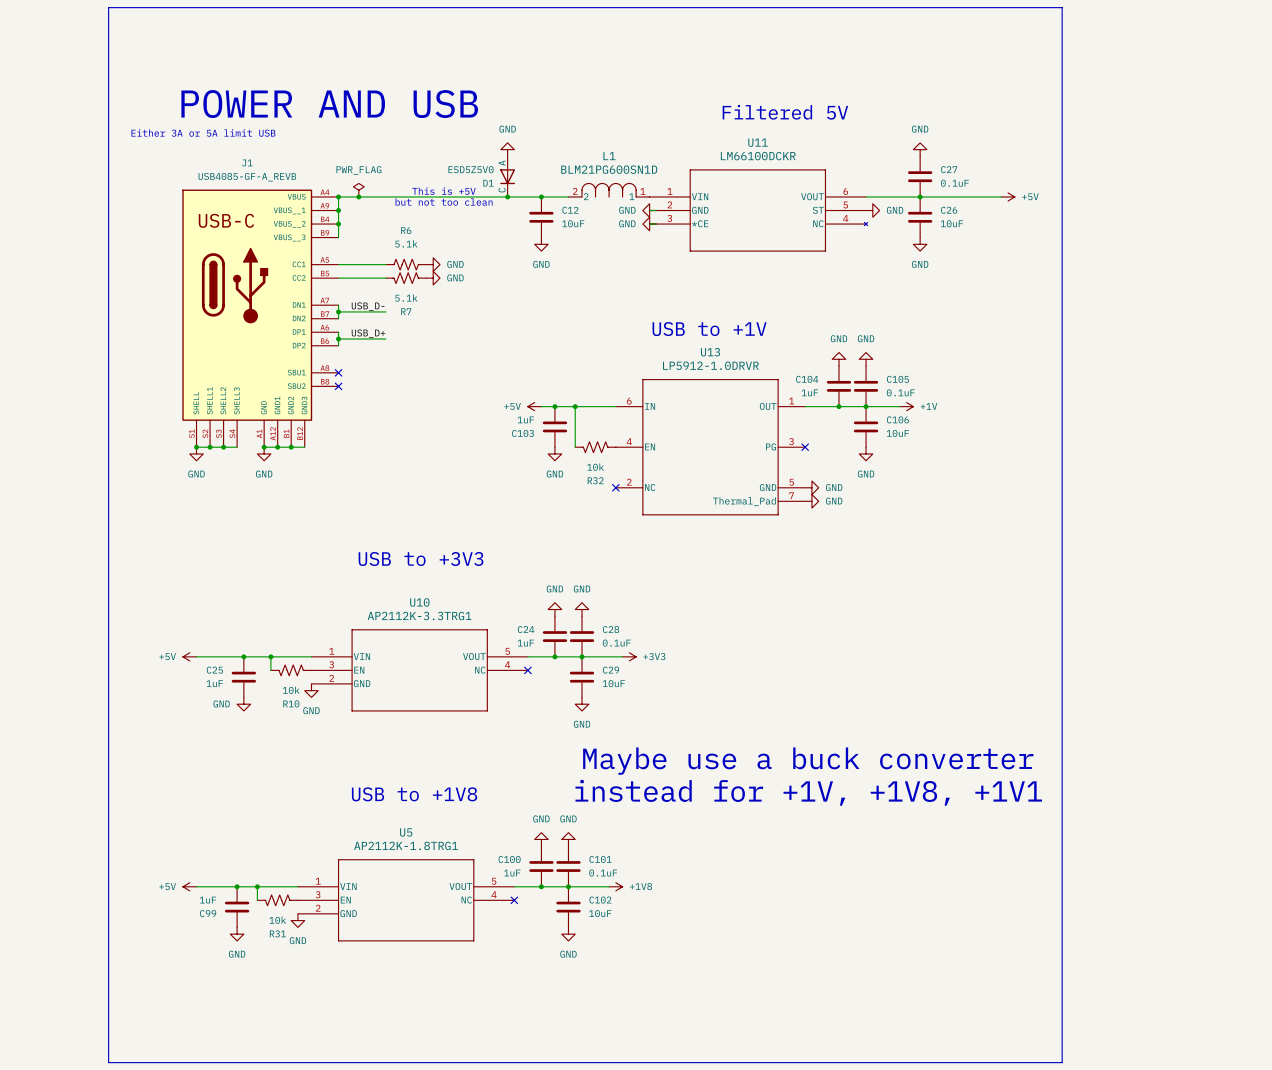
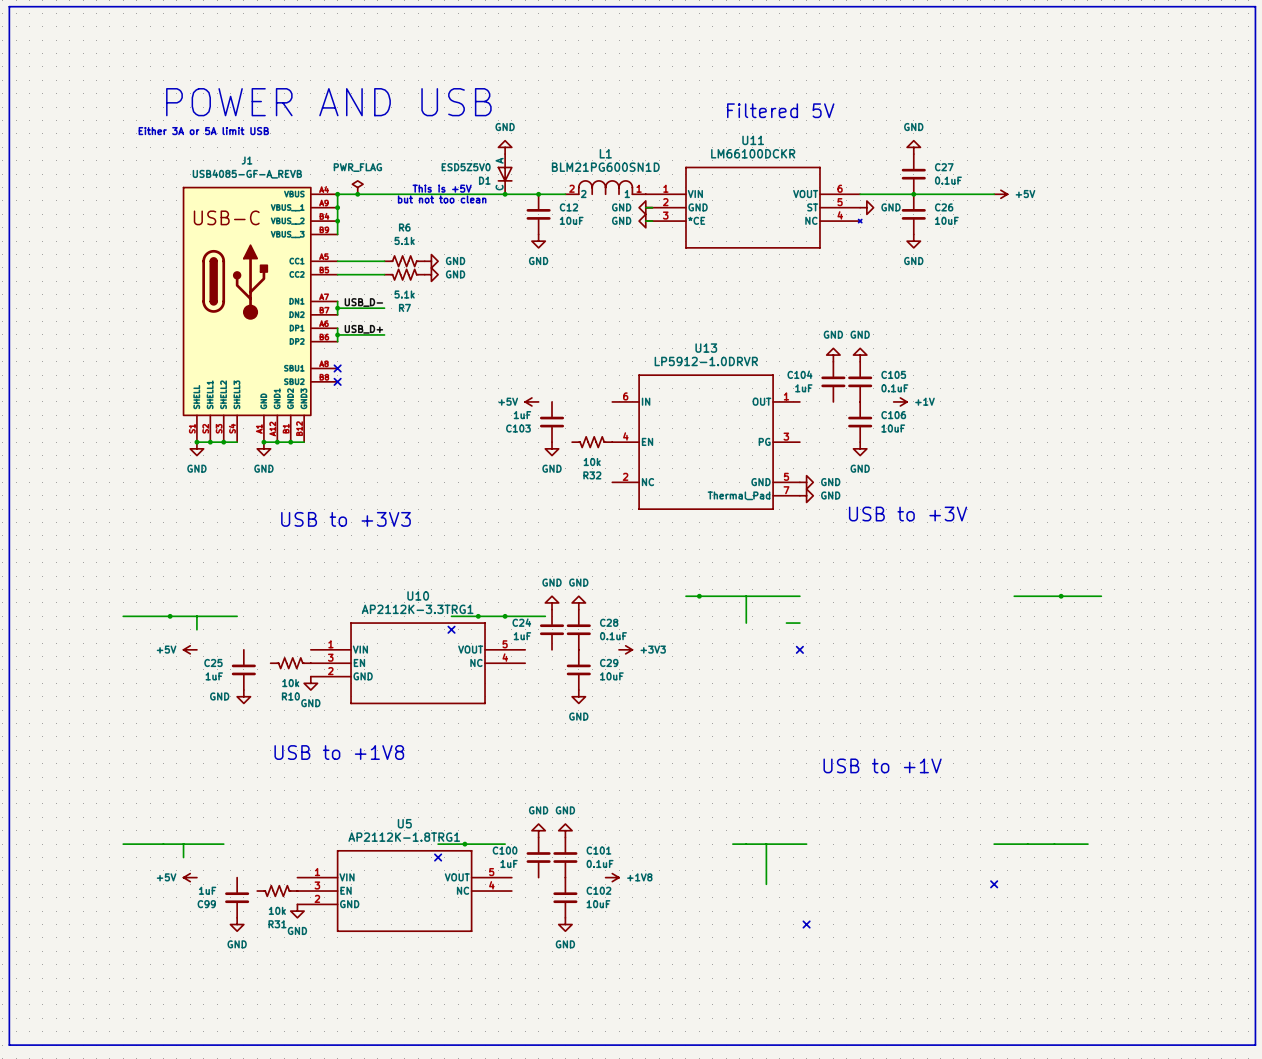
line: (108, 7) (108, 1062) (1062, 1062) (1062, 7) -> (109, 6) (9, 6) (9, 1045) (1255, 1045) (1255, 6) (1054, 6)
text: USB to +1V (709, 329) -> none
wire: (541, 406) (615, 406) -> none
junction: (554, 406) -> none
wire: (575, 406) (575, 447) -> none
junction: (575, 406) -> none
wire: (805, 406) (899, 406) -> none
junction: (838, 406) -> none
junction: (866, 406) -> none
no-connect mark: (805, 447) -> none
no-connect mark: (615, 487) -> none
text: none -> USB to +3V (908, 514)
text position: USB to +3V3 (421, 558) -> USB to +3V3 (345, 519)
wire: none -> (685, 596) (799, 596)
junction: none -> (699, 596)
wire: none -> (746, 596) (746, 623)
wire: none -> (1014, 596) (1101, 596)
junction: none -> (1061, 596)
junction: none -> (170, 616)
junction: none -> (478, 616)
junction: none -> (505, 616)
wire: none -> (786, 623) (799, 623)
no-connect mark: none -> (451, 629)
wire: (196, 656) (311, 656) -> (123, 616) (237, 616)
junction: (243, 656) -> none
wire: (270, 656) (270, 670) -> (196, 616) (196, 629)
junction: (270, 656) -> none
wire: (527, 656) (622, 656) -> (451, 616) (545, 616)
junction: (554, 656) -> none
junction: (582, 656) -> none
no-connect mark: none -> (799, 649)
no-connect mark: (527, 670) -> none
text: Maybe use a buck converter (808, 761) -> none
text: none -> USB to +1V (882, 765)
text: instead for +1V, +1V8, +1V1 (808, 792) -> none
text position: USB to +1V8 (414, 794) -> USB to +1V8 (339, 752)
wire: none -> (438, 844) (505, 844)
junction: none -> (464, 844)
wire: none -> (732, 844) (806, 844)
wire: none -> (766, 844) (766, 884)
wire: none -> (994, 844) (1087, 844)
no-connect mark: none -> (438, 857)
wire: (196, 886) (297, 886) -> (123, 844) (223, 844)
junction: (237, 886) -> none
wire: (257, 886) (257, 900) -> (183, 844) (183, 857)
junction: (257, 886) -> none
wire: (514, 886) (609, 886) -> none
junction: (541, 886) -> none
junction: (568, 886) -> none
no-connect mark: none -> (994, 884)
no-connect mark: (514, 900) -> none
no-connect mark: none -> (806, 924)

